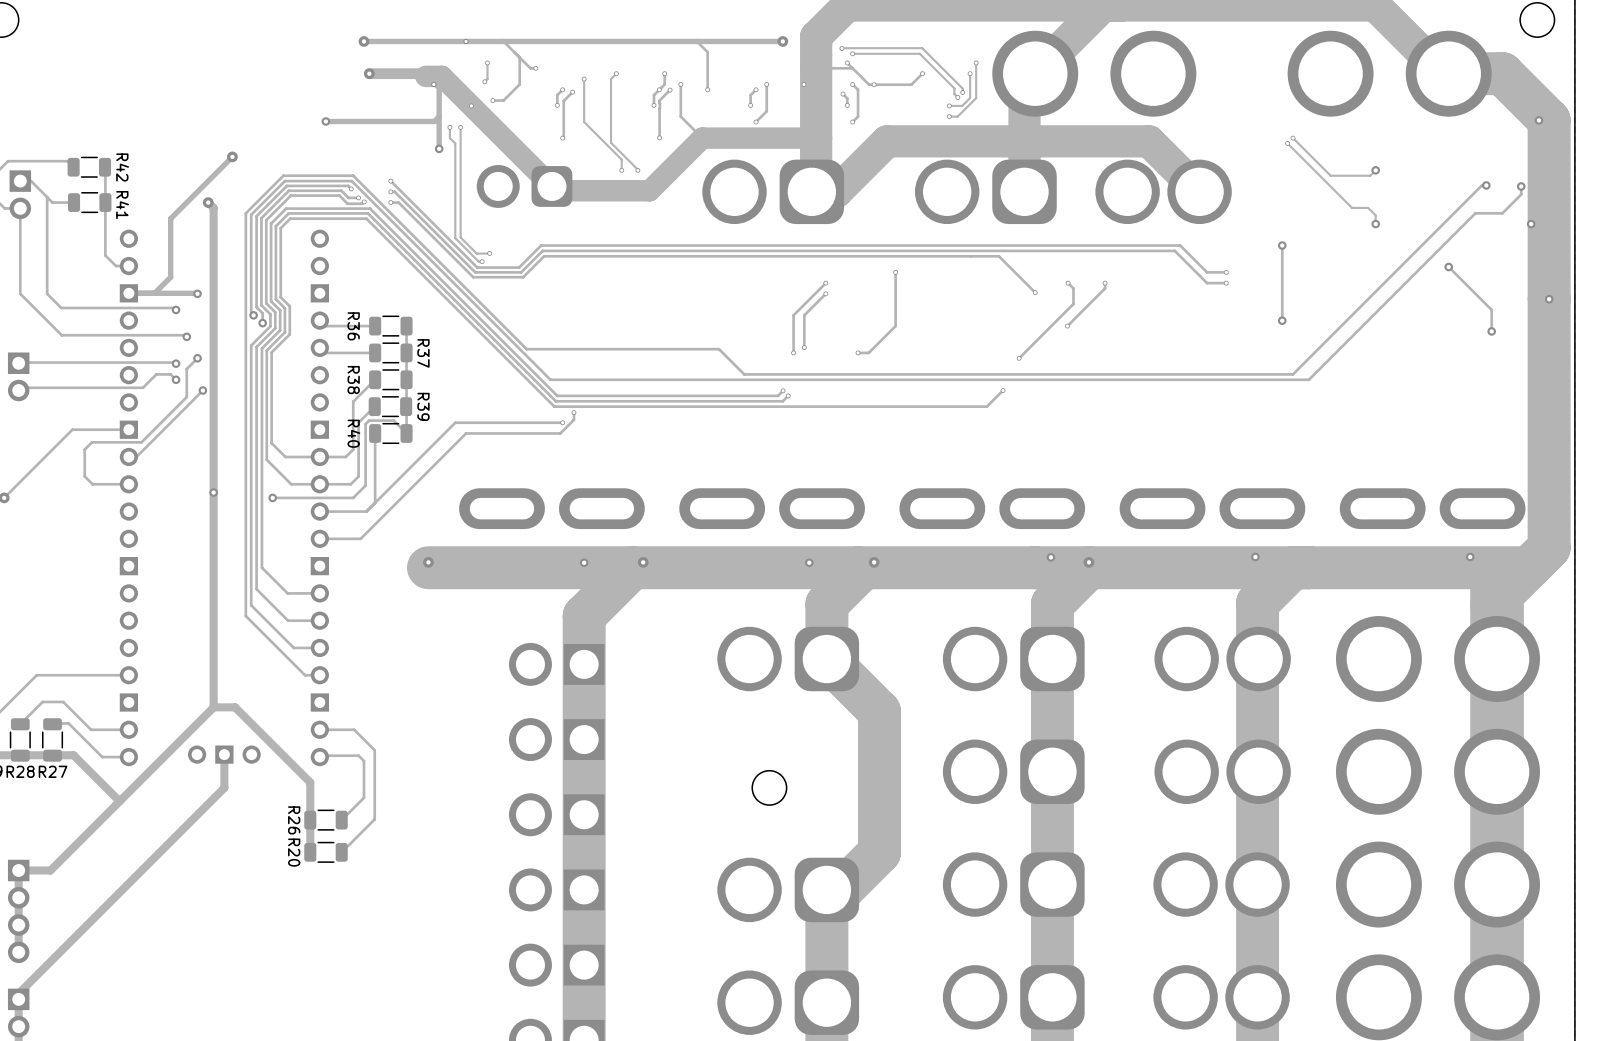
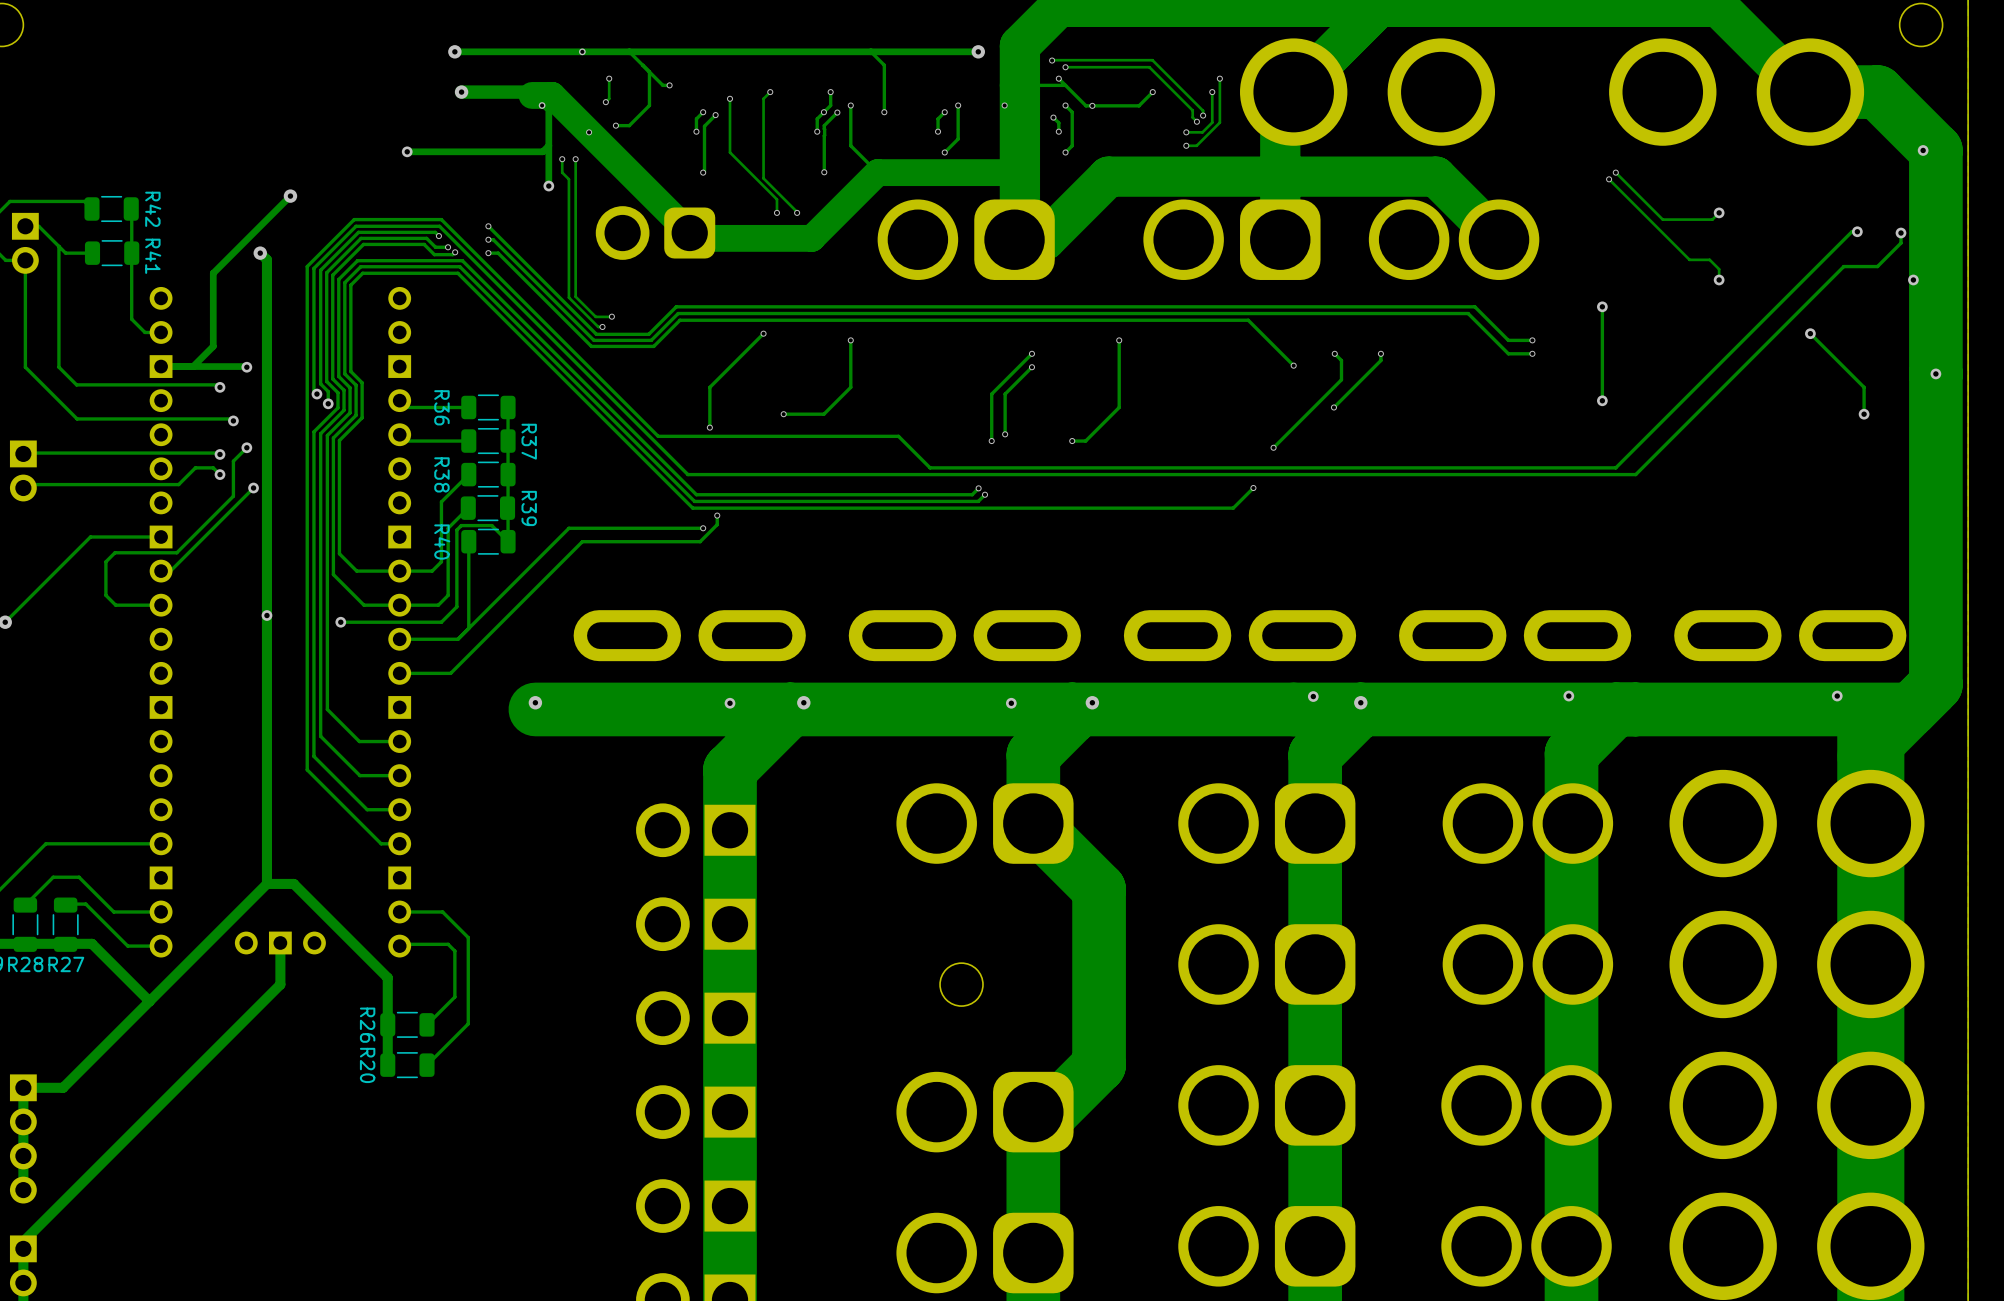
track: none -> (763, 333) (709, 387) (709, 427)
via: none -> (763, 333)
track: none -> (850, 340) (850, 387) (823, 414) (783, 414)
via: none -> (850, 340)
via: none -> (783, 414)
via: none -> (709, 427)

